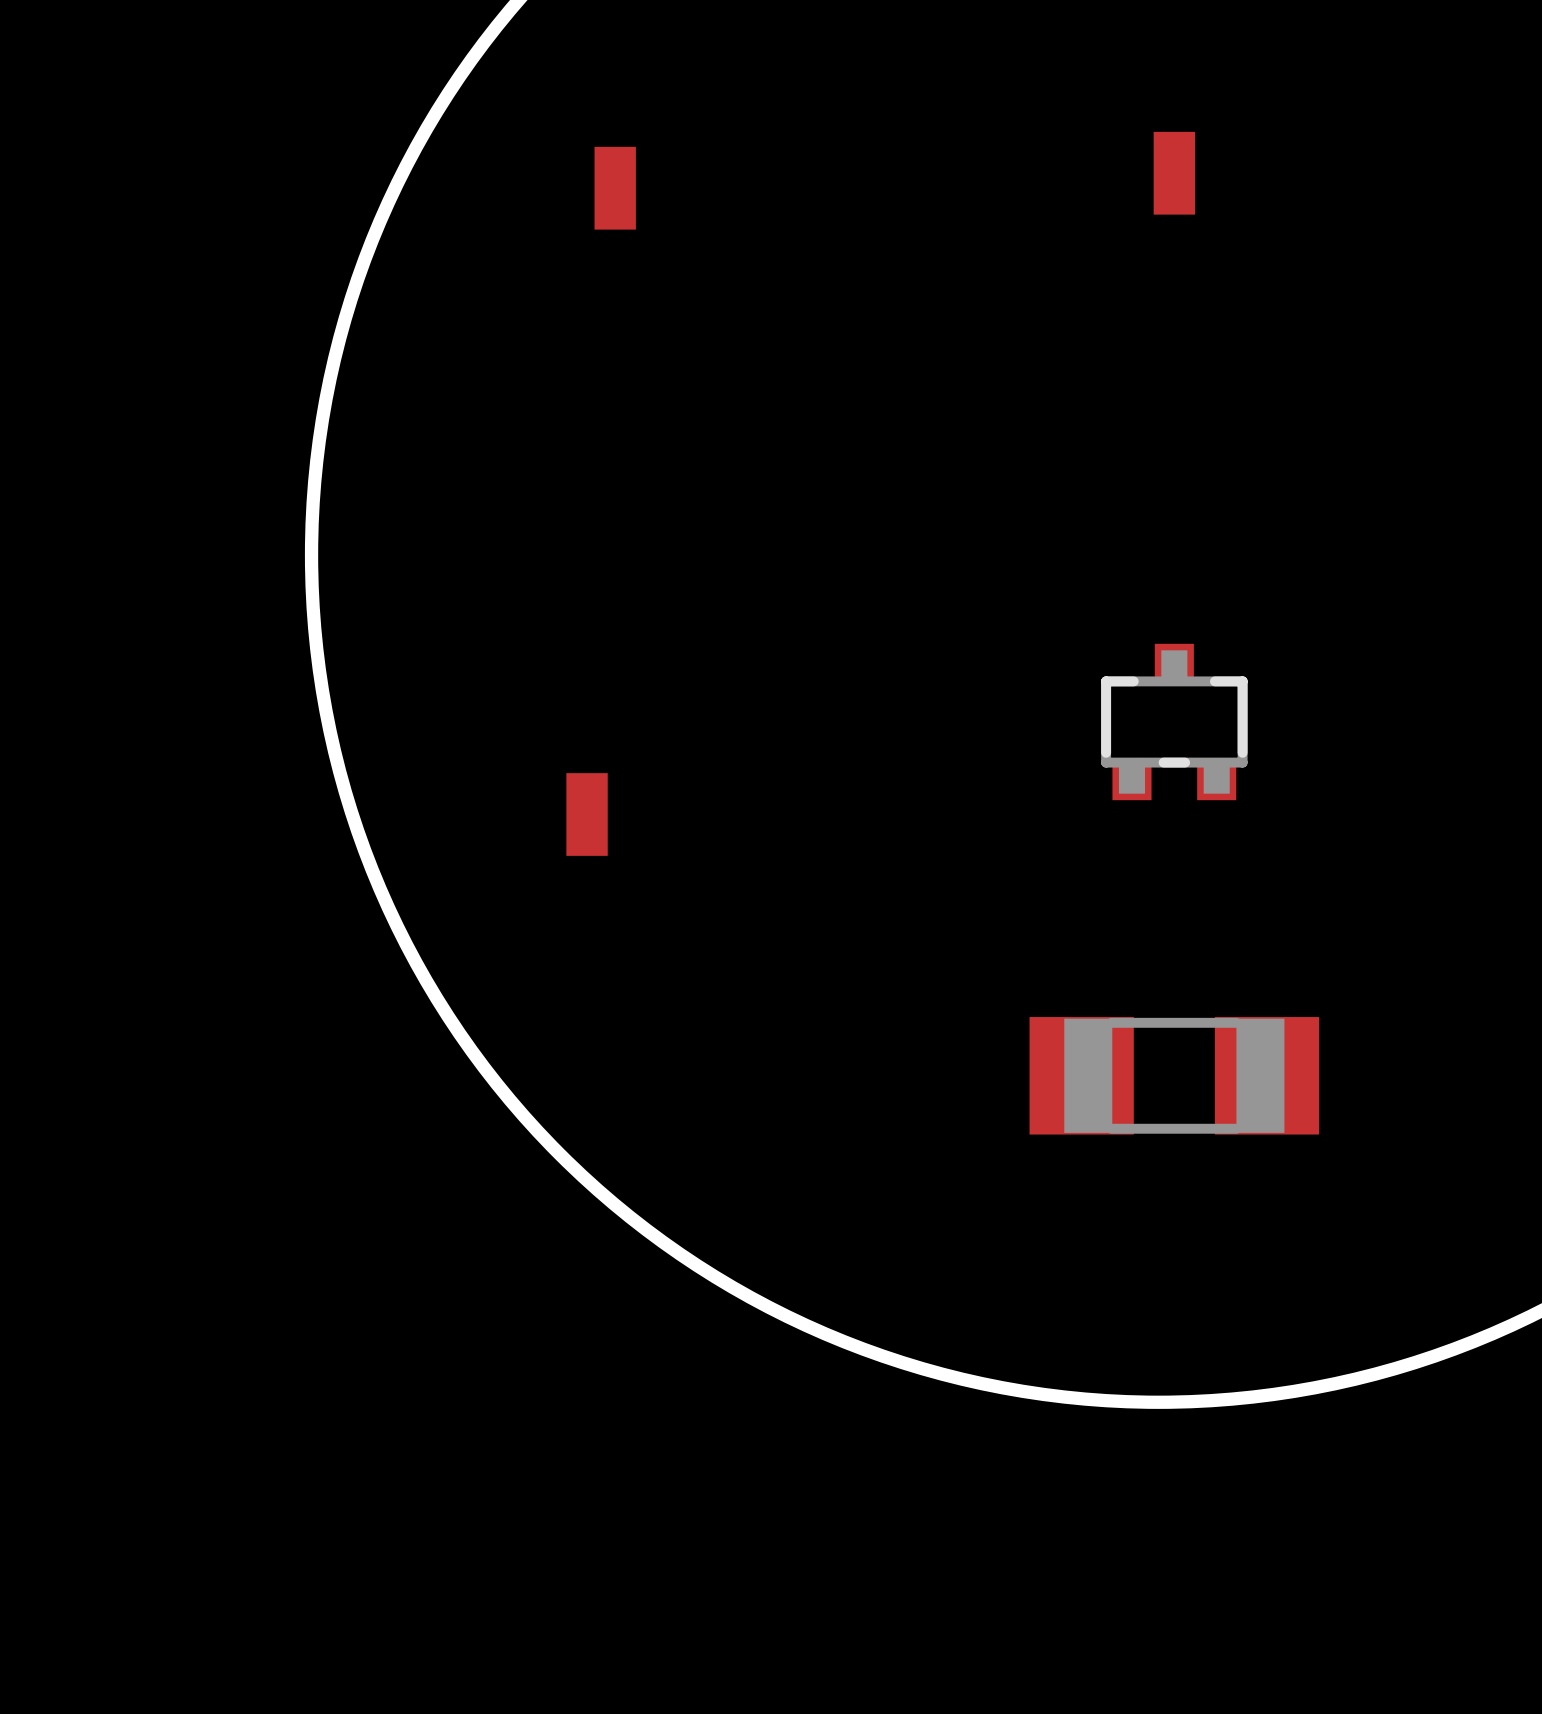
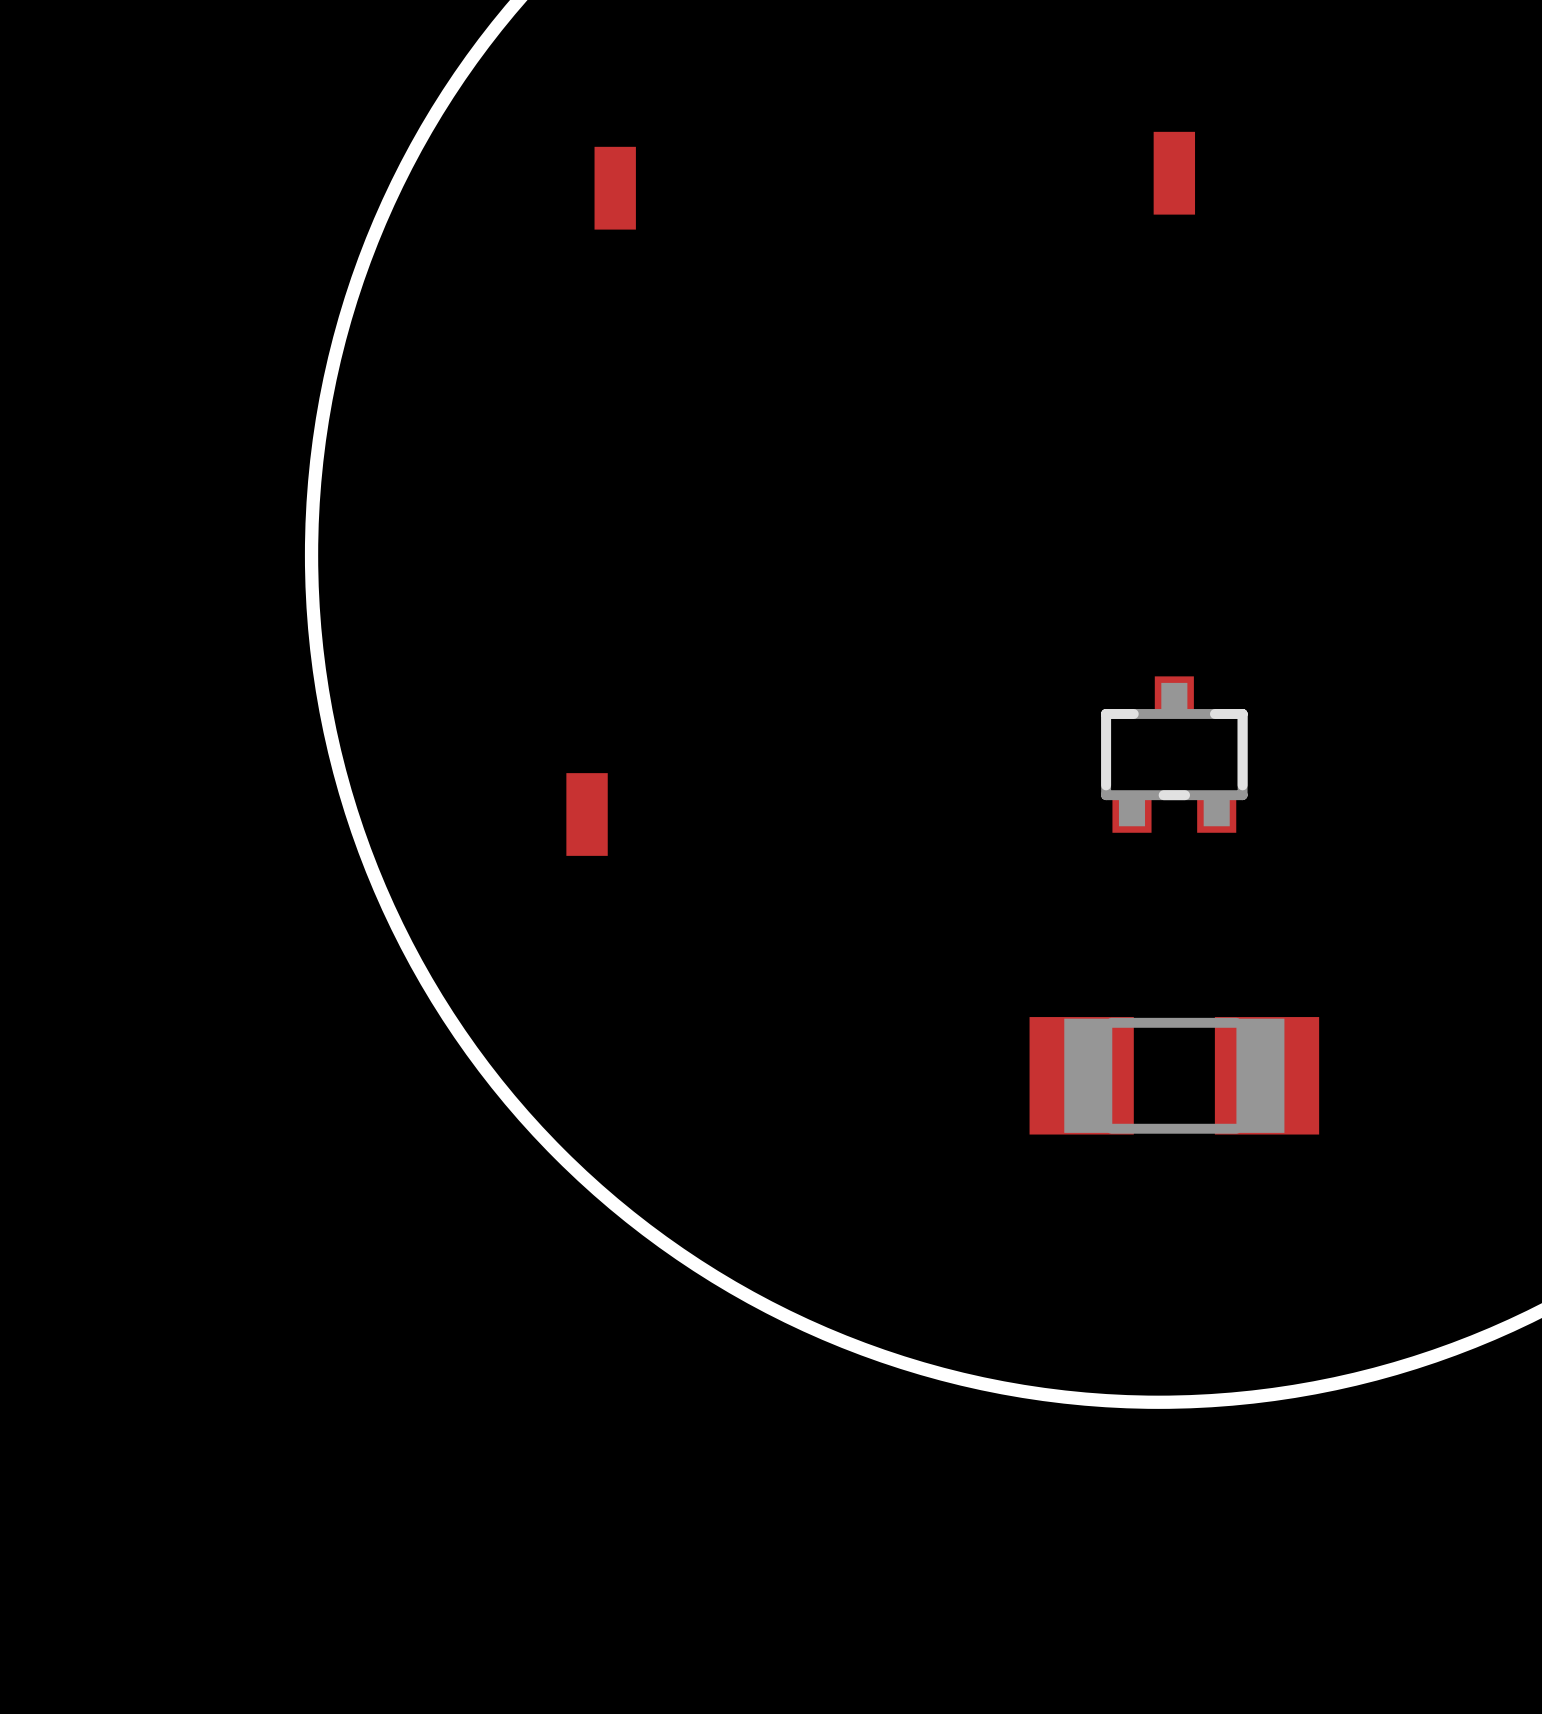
part position: (1174, 721) -> (1174, 754)

